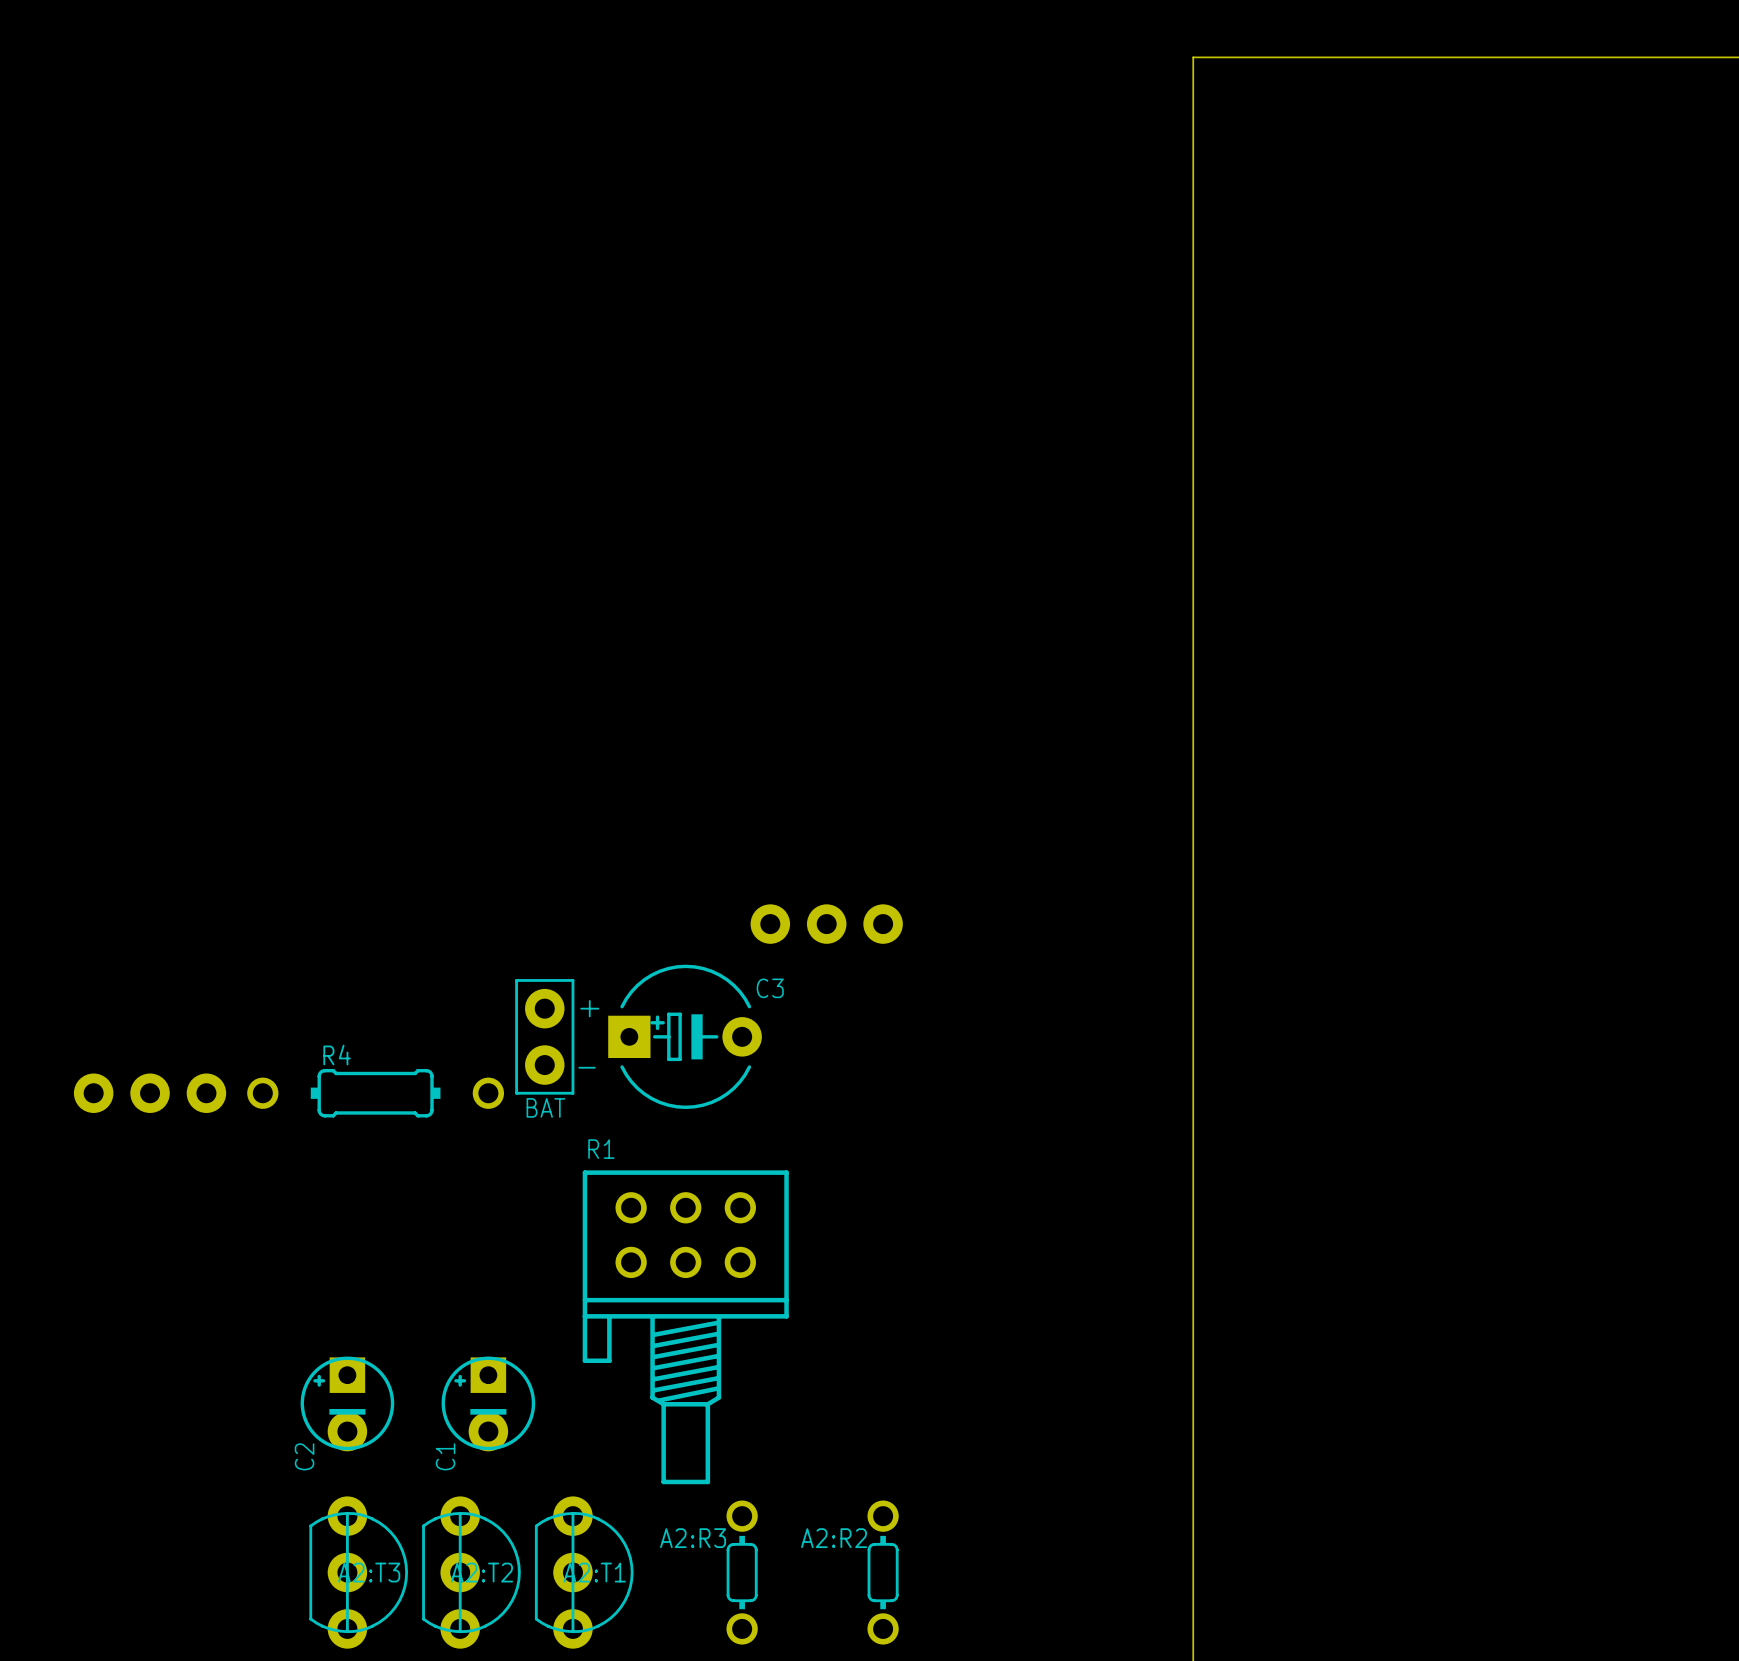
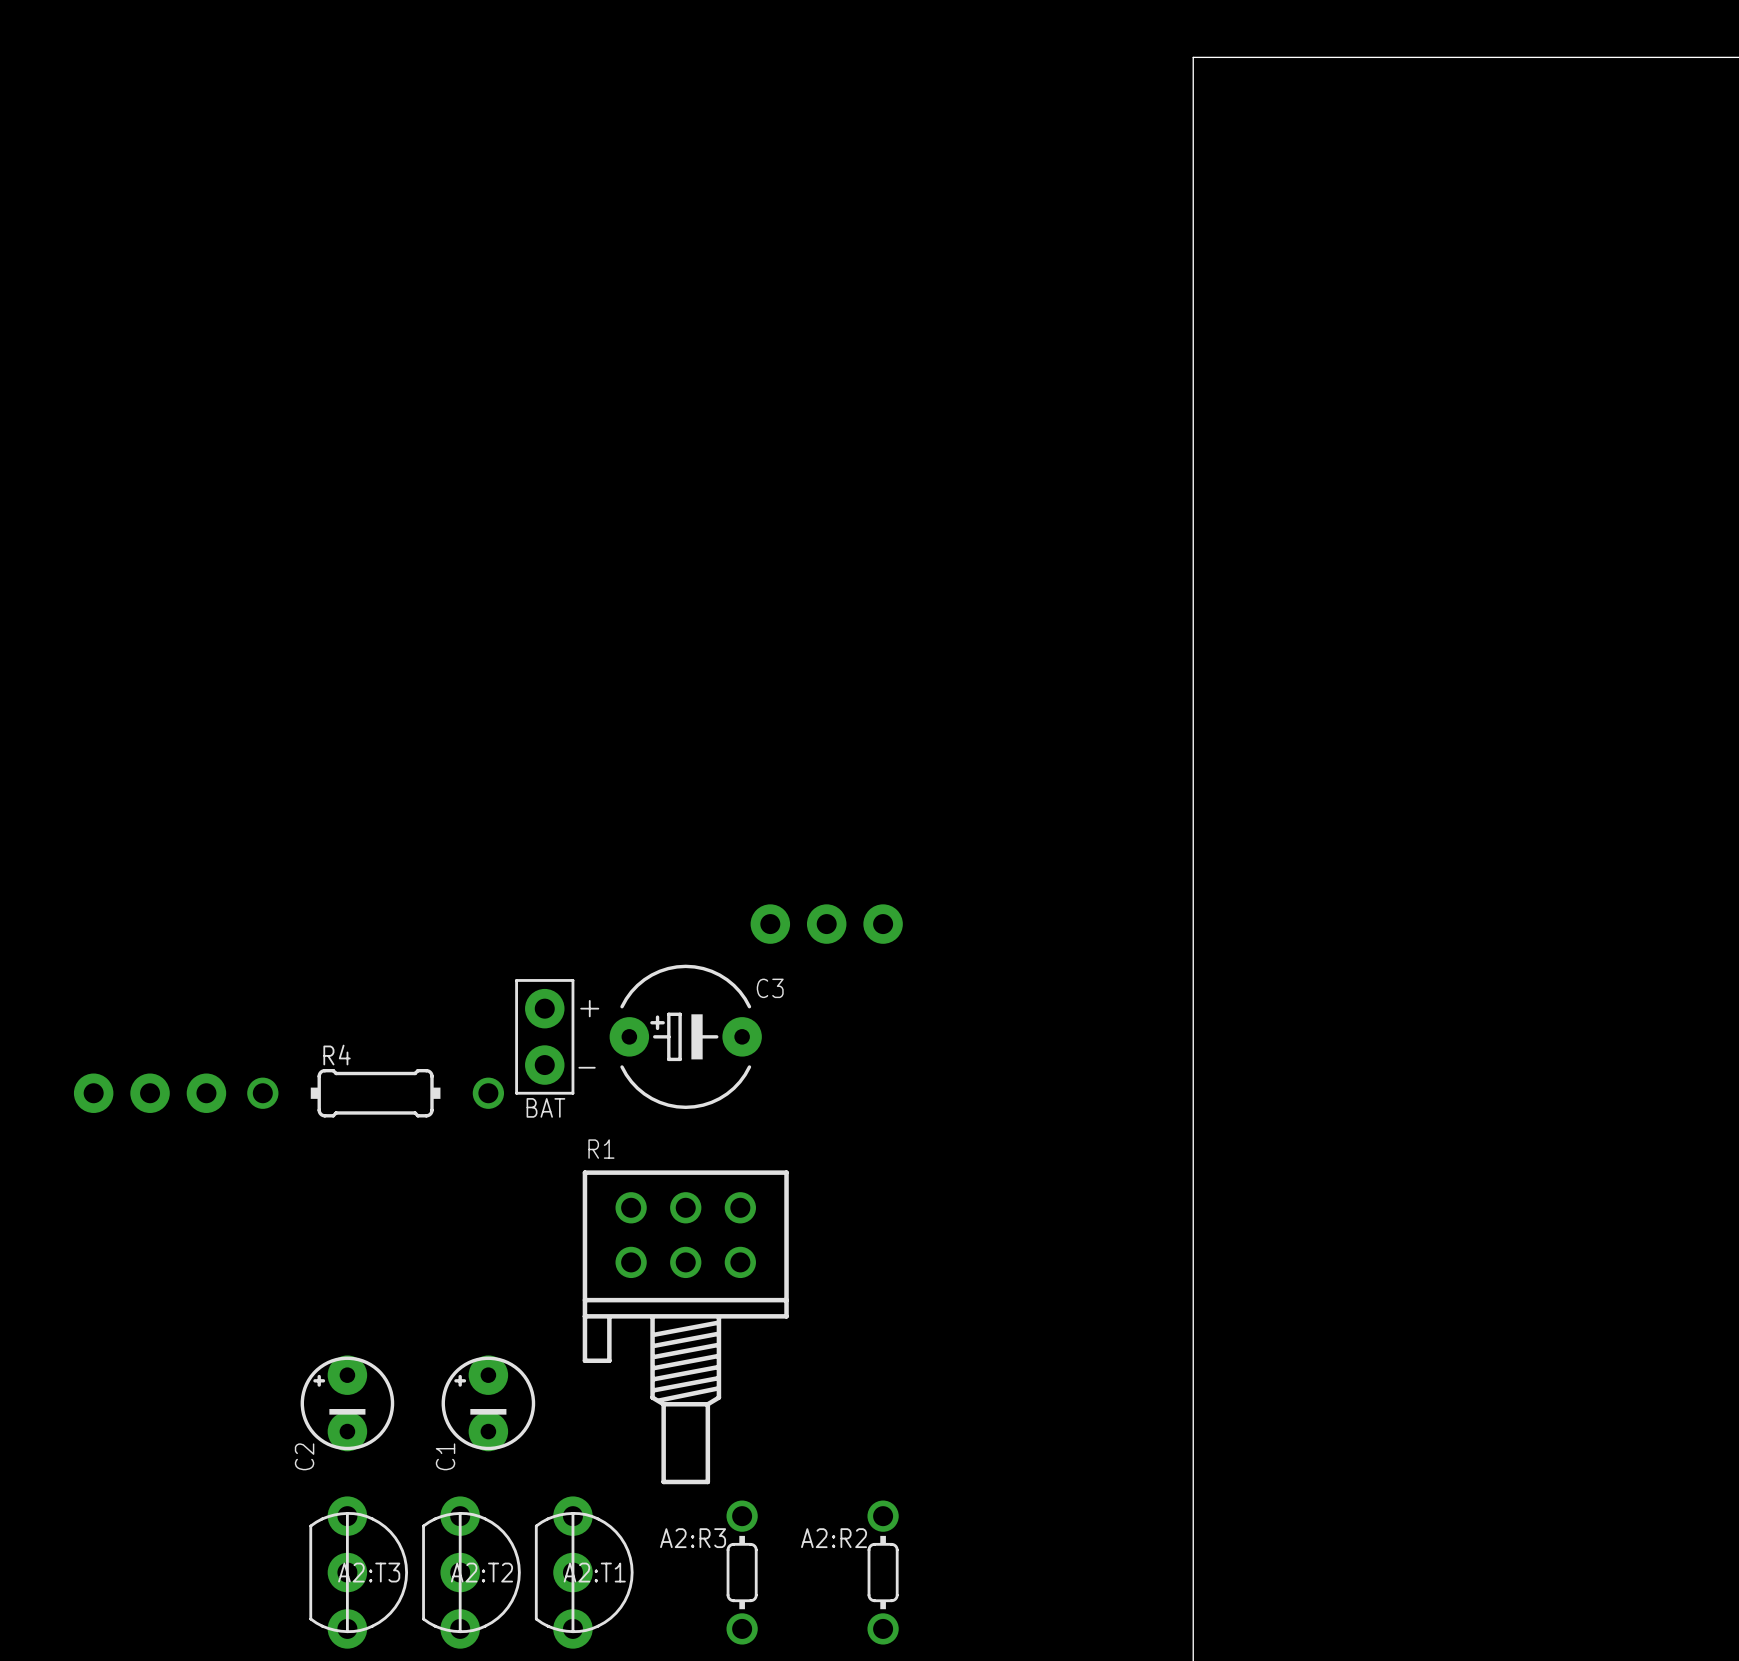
C3 footprint: [608, 964, 762, 1110] -> [609, 964, 762, 1110]
C2 footprint: [300, 1356, 395, 1452] -> [300, 1355, 395, 1452]
C1 footprint: [441, 1356, 536, 1452] -> [441, 1355, 536, 1452]

